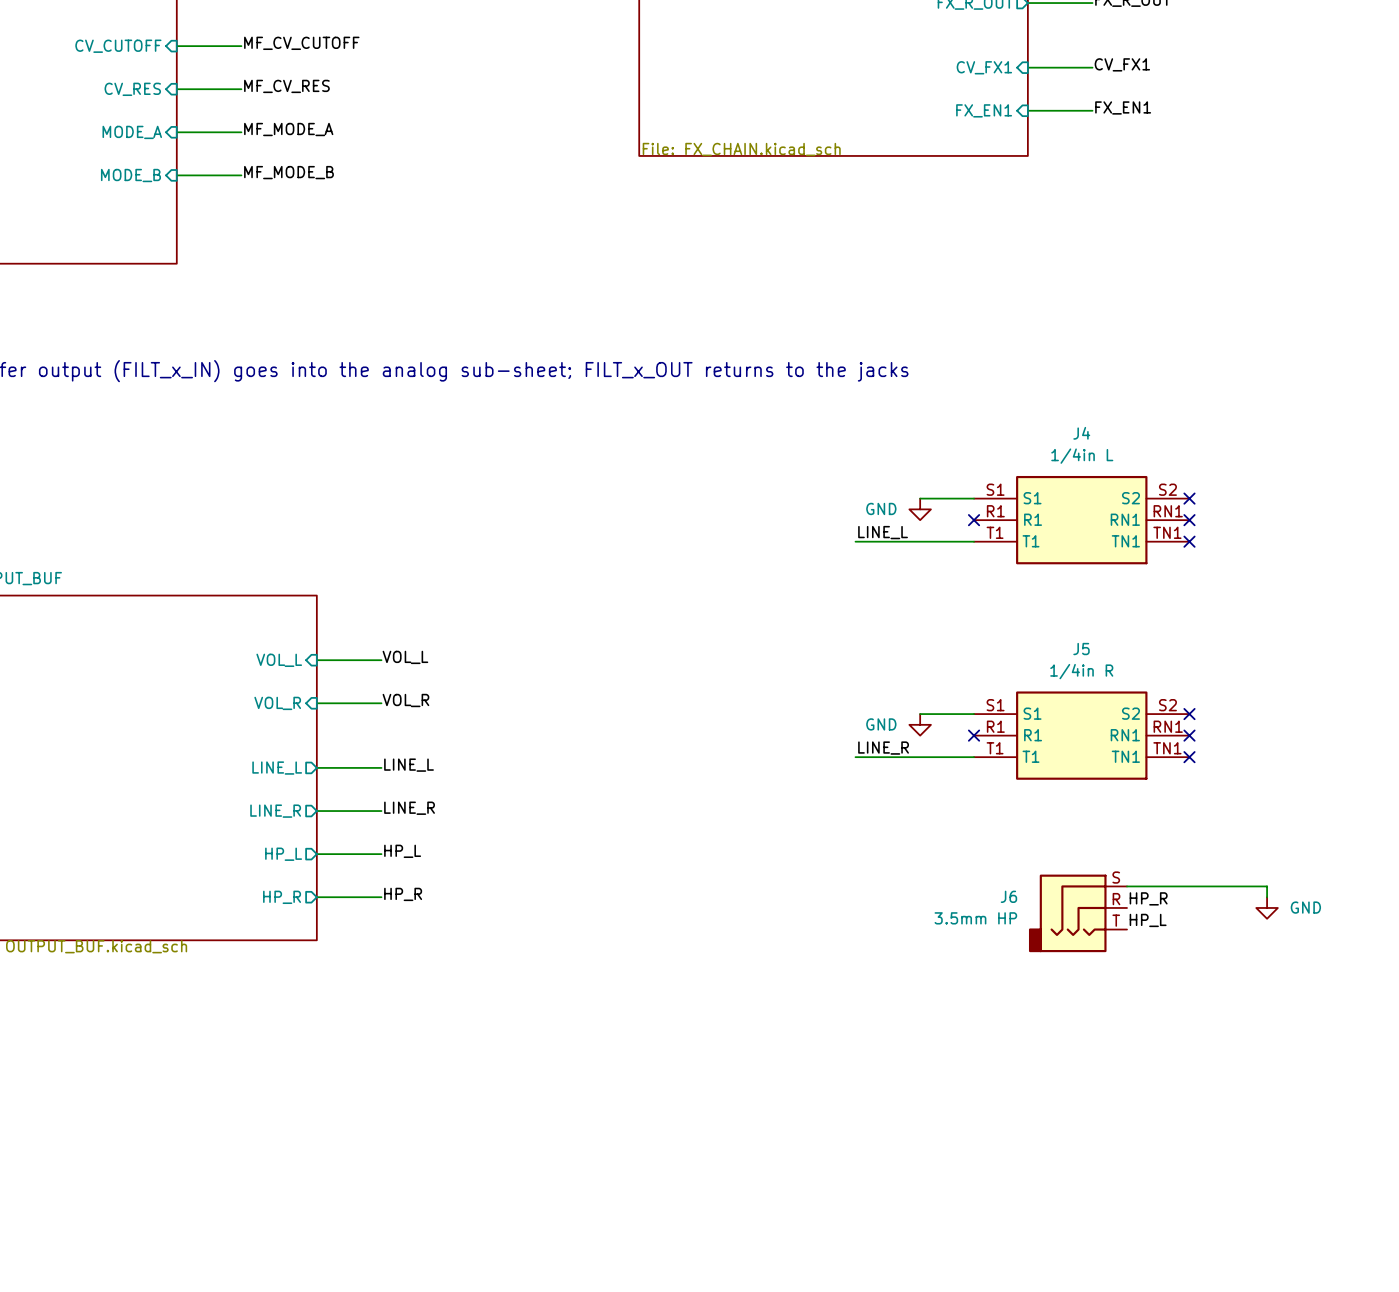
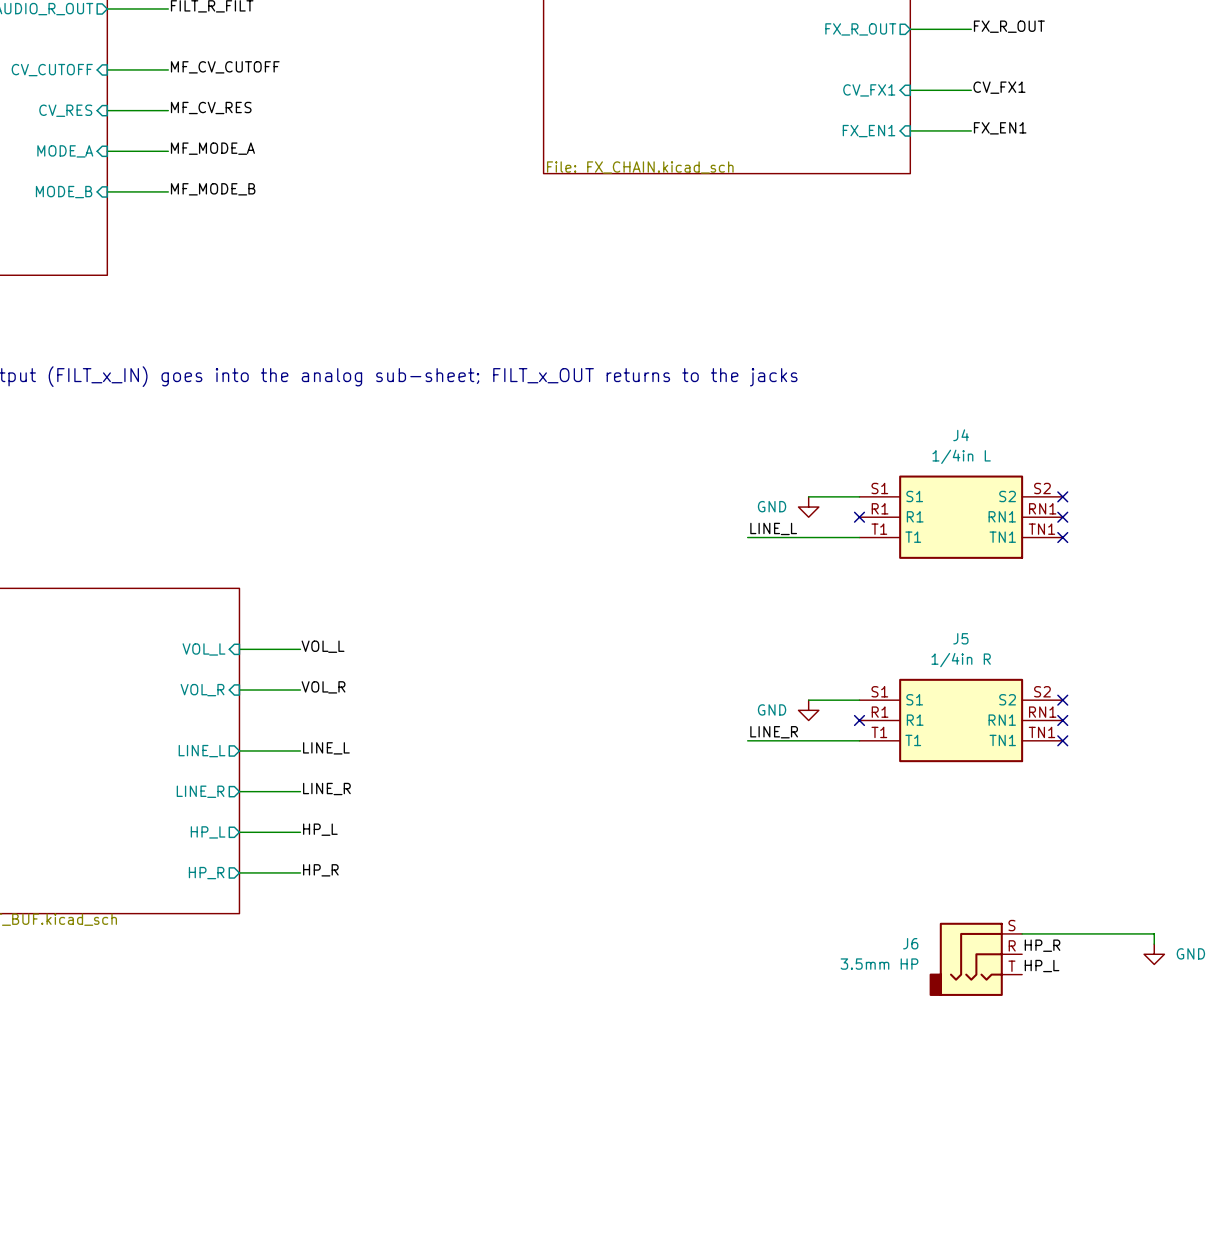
wire: (1127, 886) (1267, 886) (1267, 897) -> (1022, 933) (1154, 933) (1154, 944)
label position: HP_R (1148, 898) -> HP_R (1042, 945)
power symbol position: GND (1267, 907) -> GND (1154, 954)
J6 position: (1077, 913) -> (975, 959)
label position: HP_L (1148, 920) -> HP_L (1042, 966)

